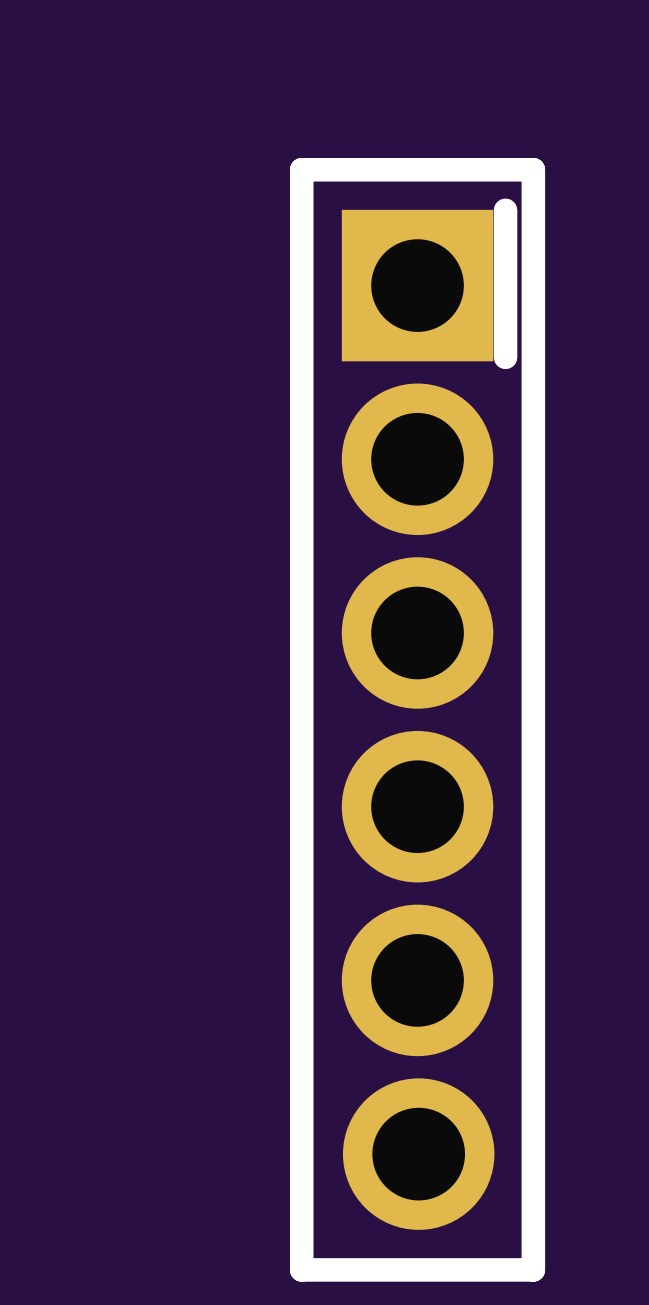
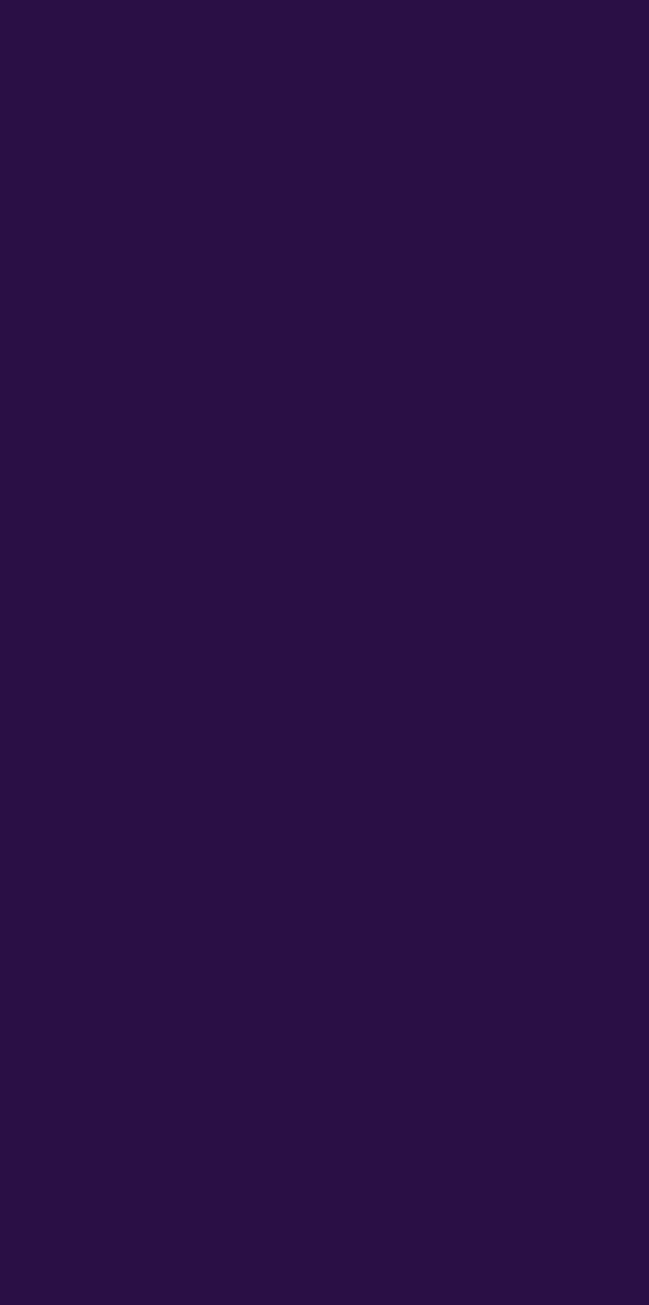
part: (417, 719) -> none

